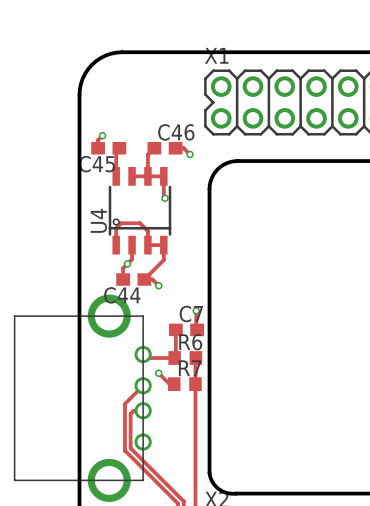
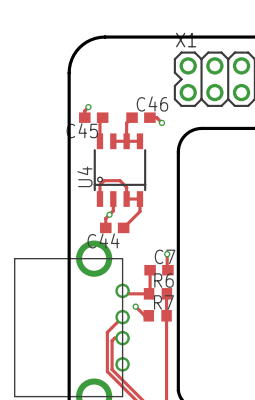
track: (163, 176) (165, 198) -> none
via: (165, 198) -> none
track: (144, 279) (152, 279) (158, 285) -> none
via: (158, 285) -> none

